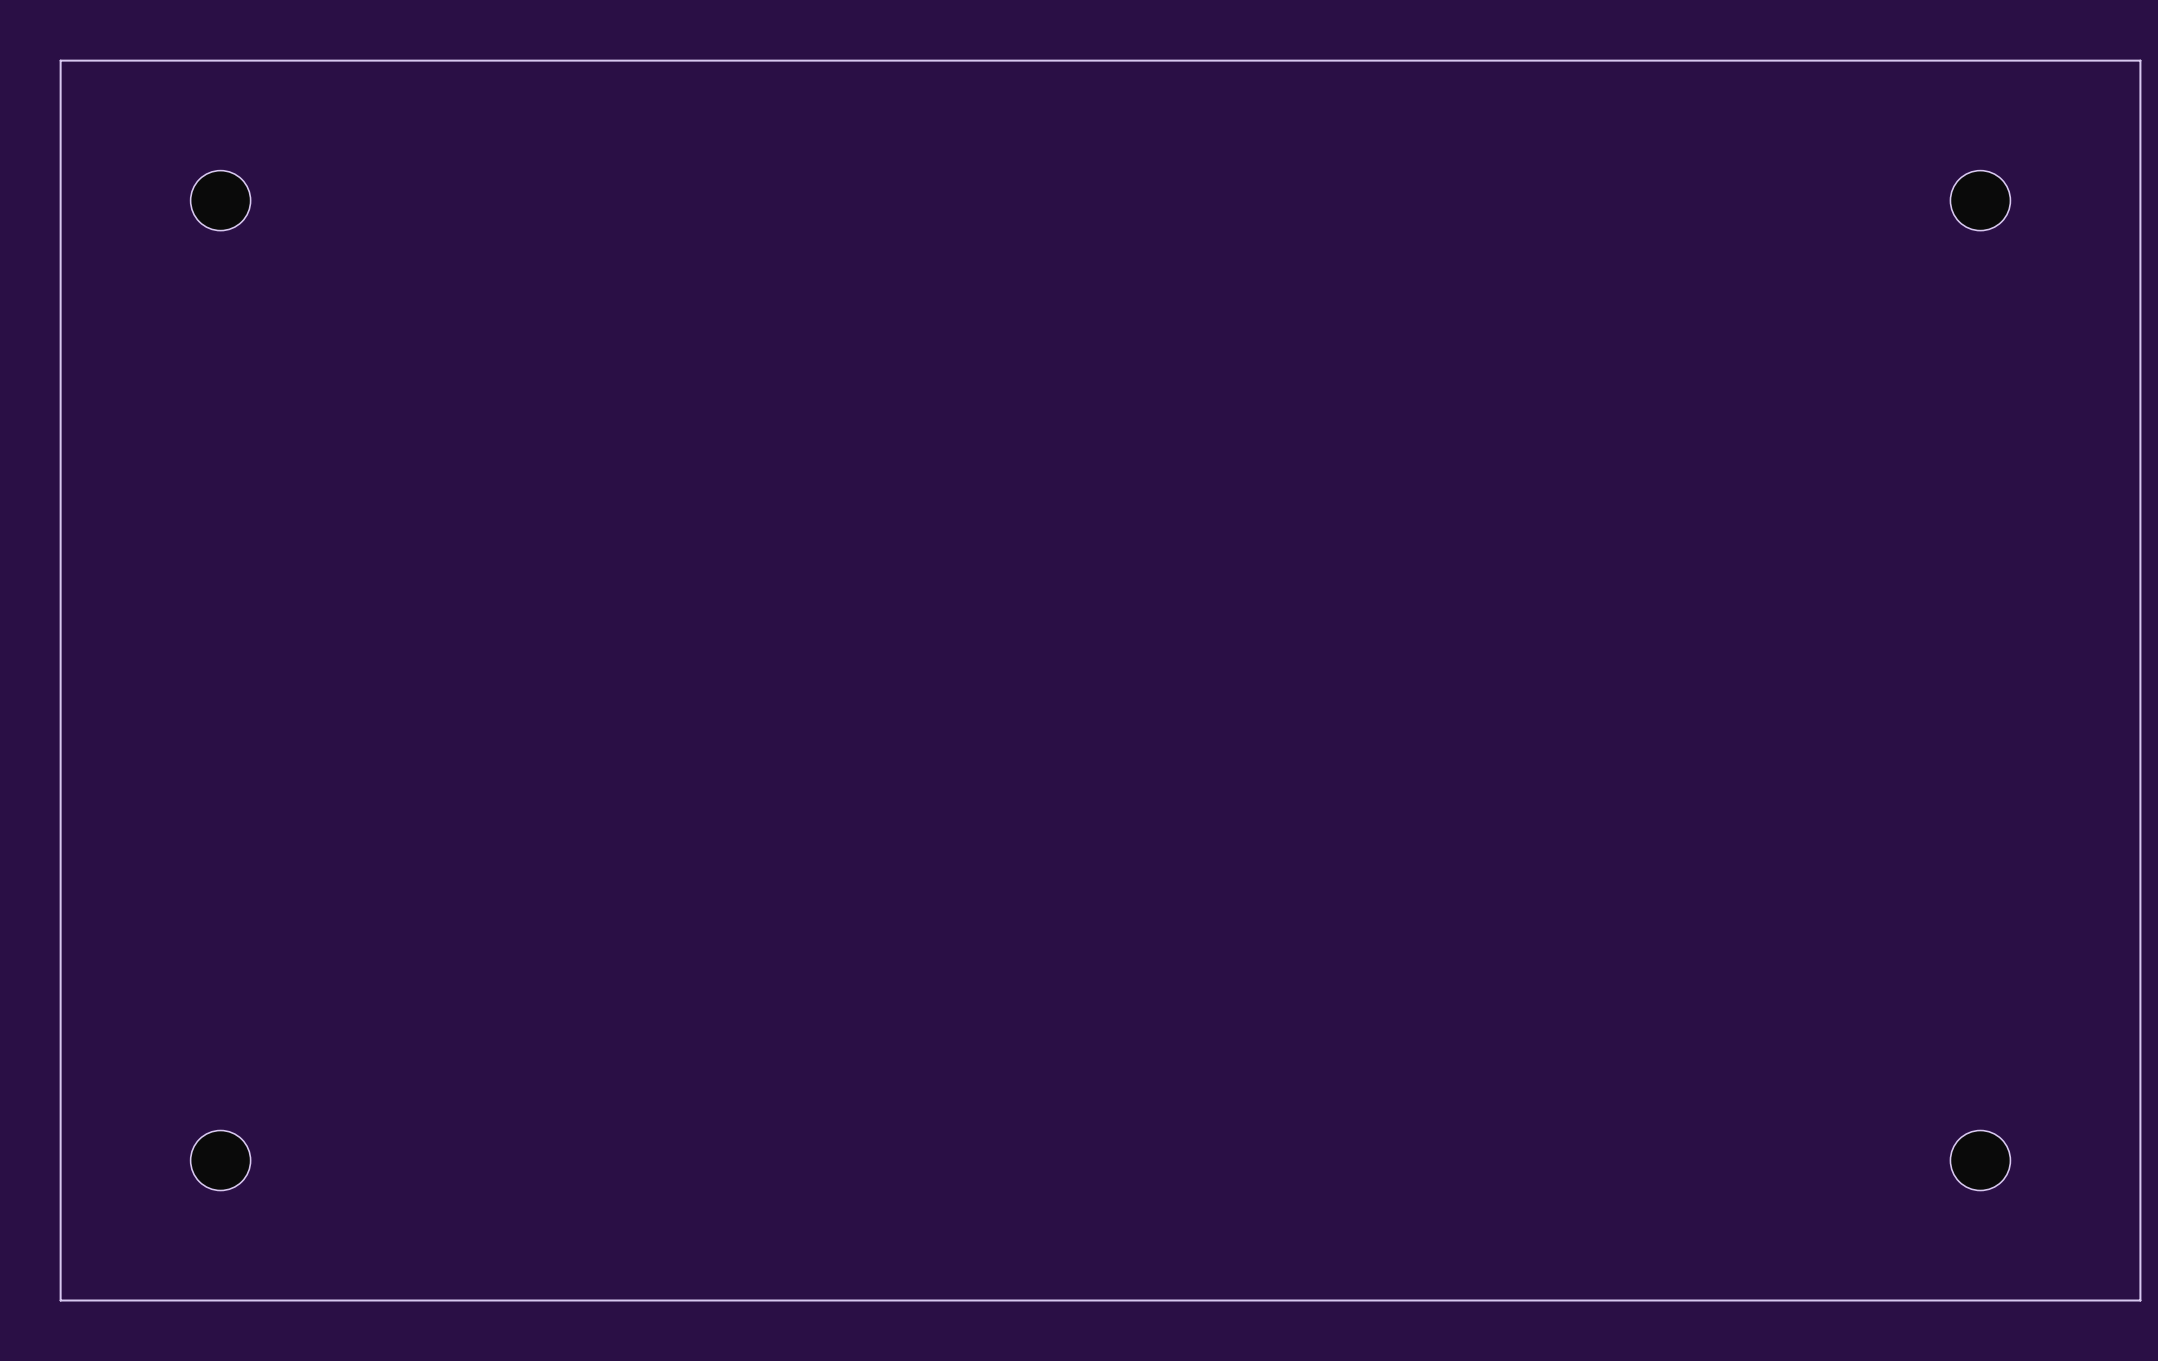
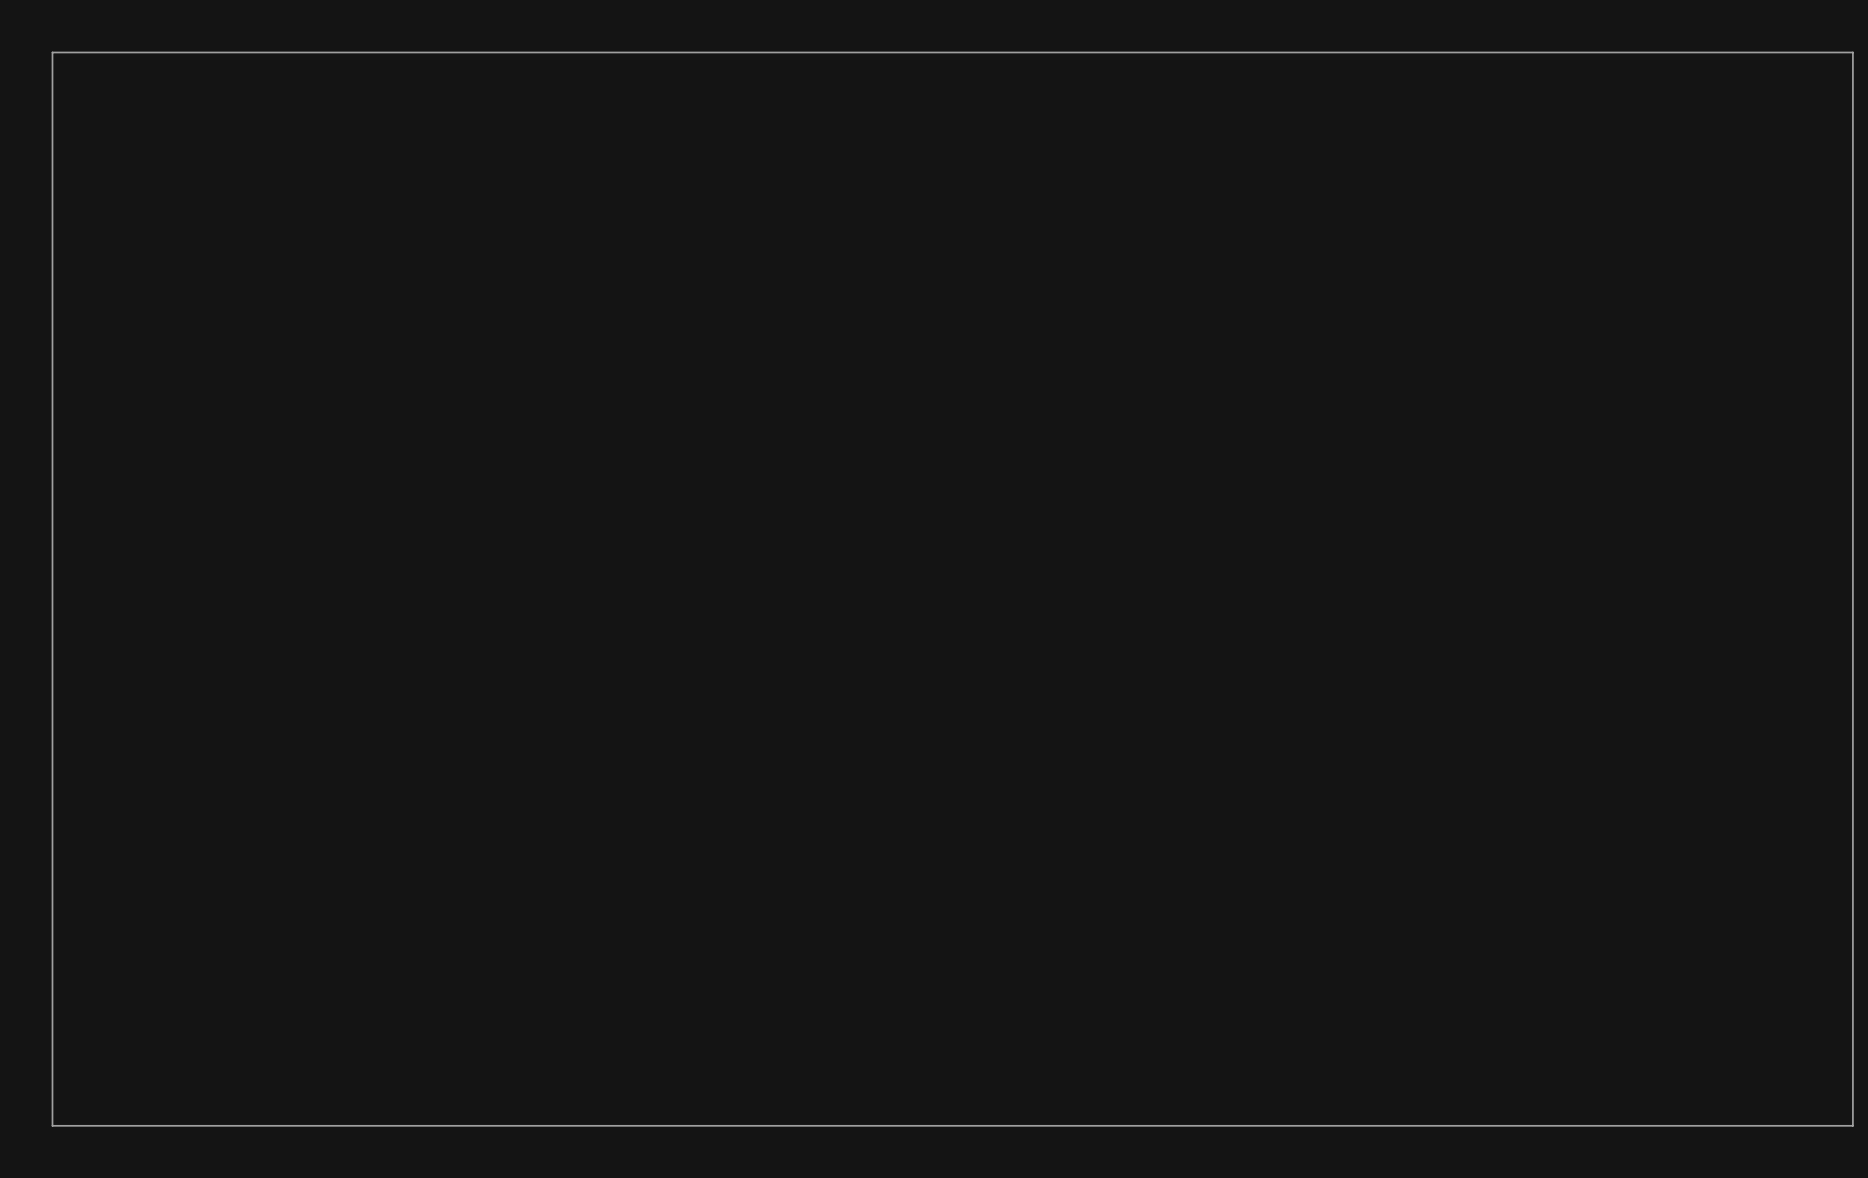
part: (220, 200) -> none
part: (1980, 200) -> none
part: (220, 1160) -> none
part: (1980, 1160) -> none

